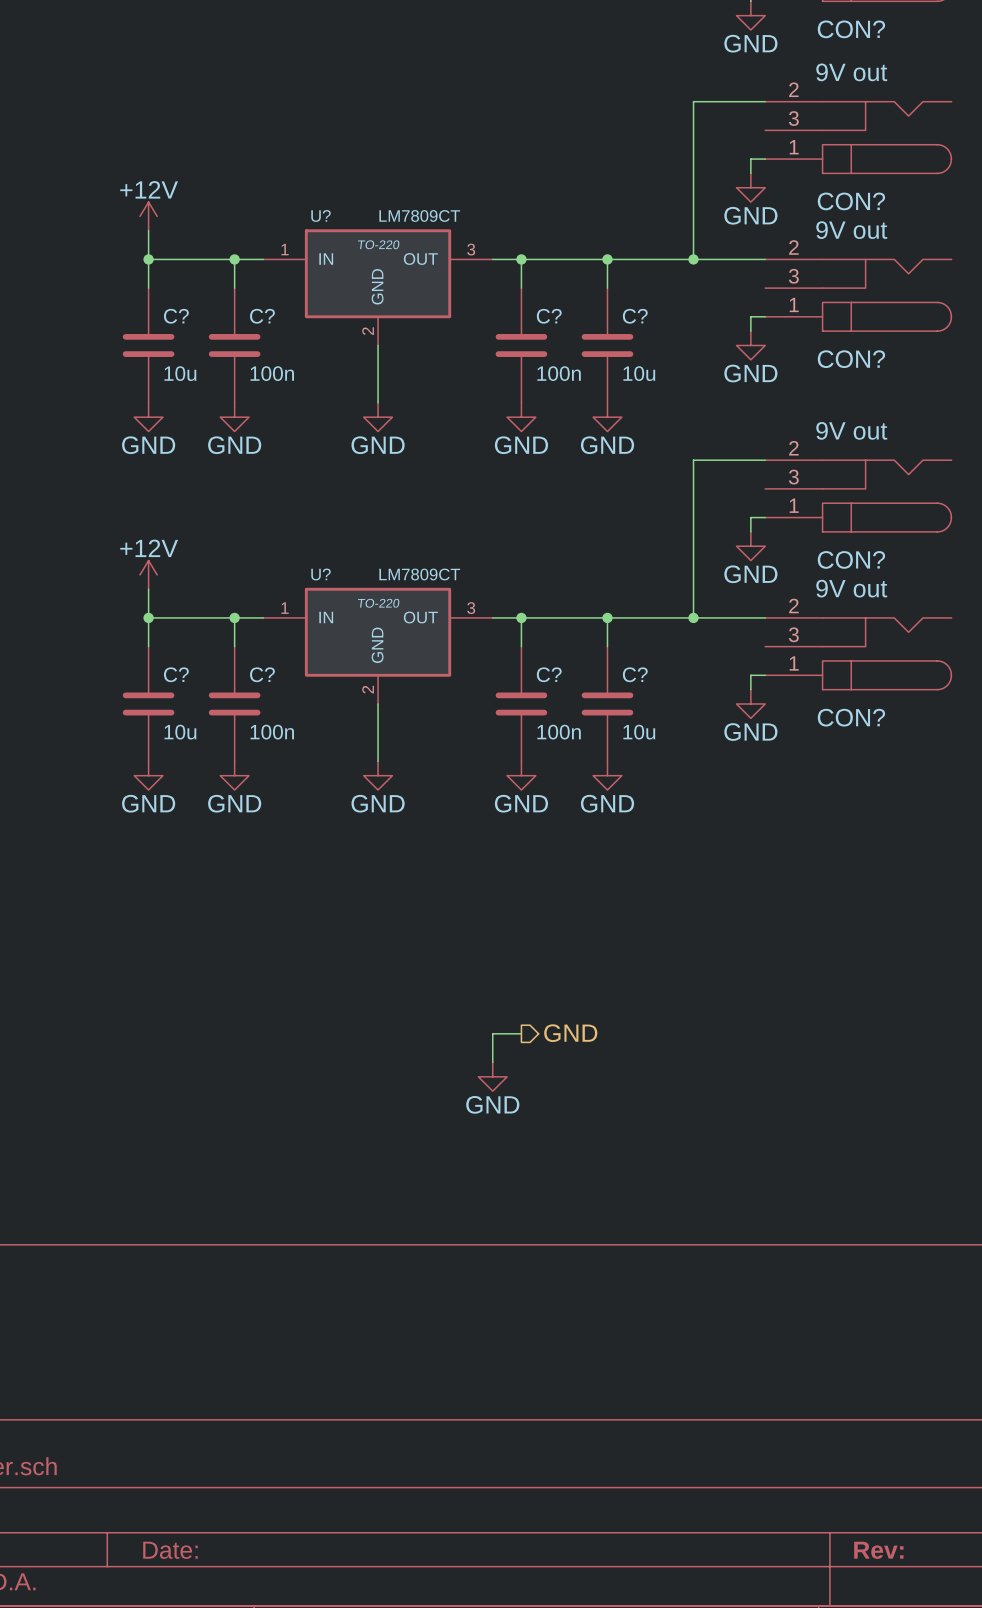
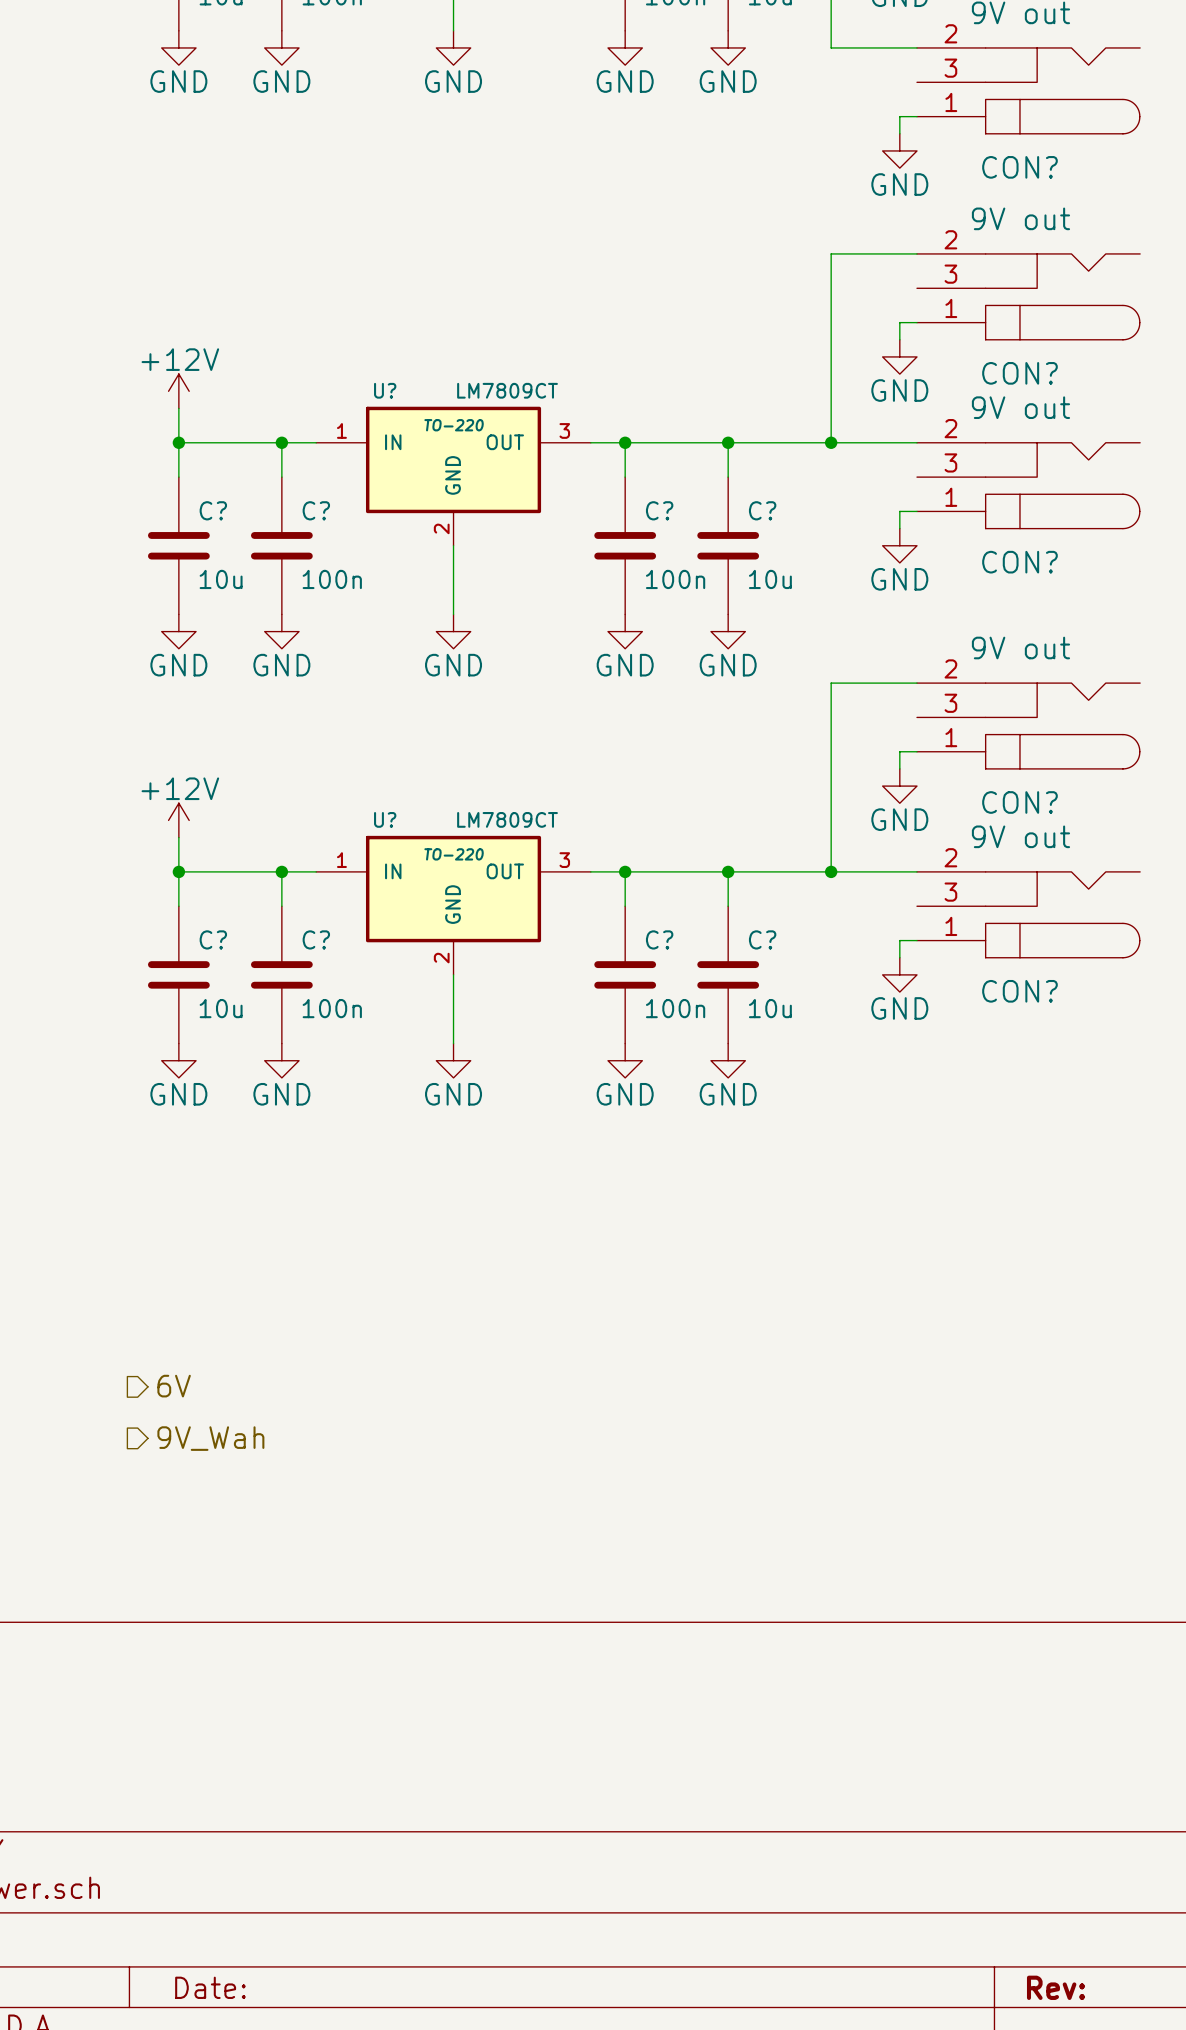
wire: (521, 1033) (492, 1033) (492, 1062) -> none
hierarchical label: GND (570, 1033) -> none
hierarchical label: none -> 6V (174, 1386)
power symbol: GND (492, 1076) -> none
hierarchical label: none -> 9V_Wah (210, 1438)

